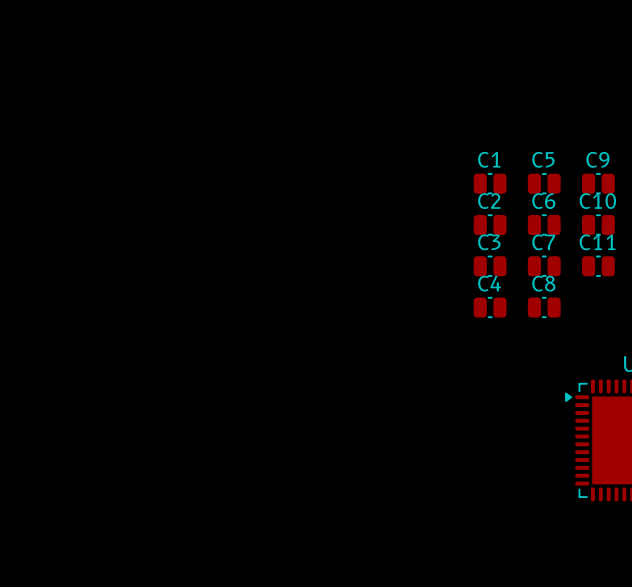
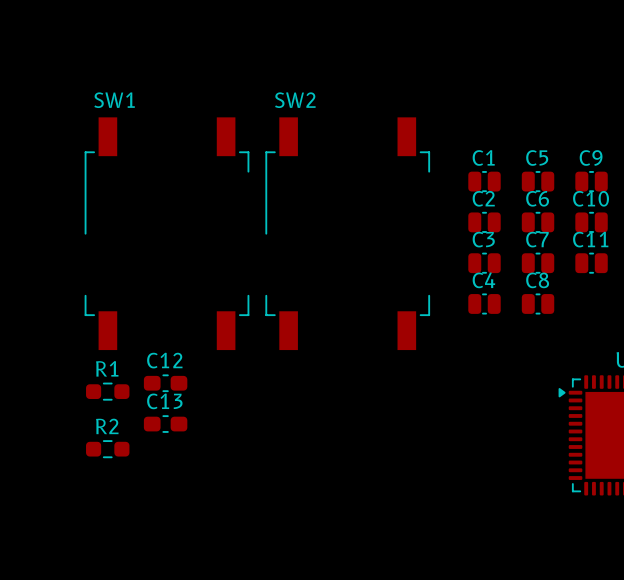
SW1: none -> (167, 233)
SW2: none -> (347, 233)
C12: none -> (165, 383)
R1: none -> (107, 391)
C13: none -> (165, 424)
R2: none -> (107, 449)

